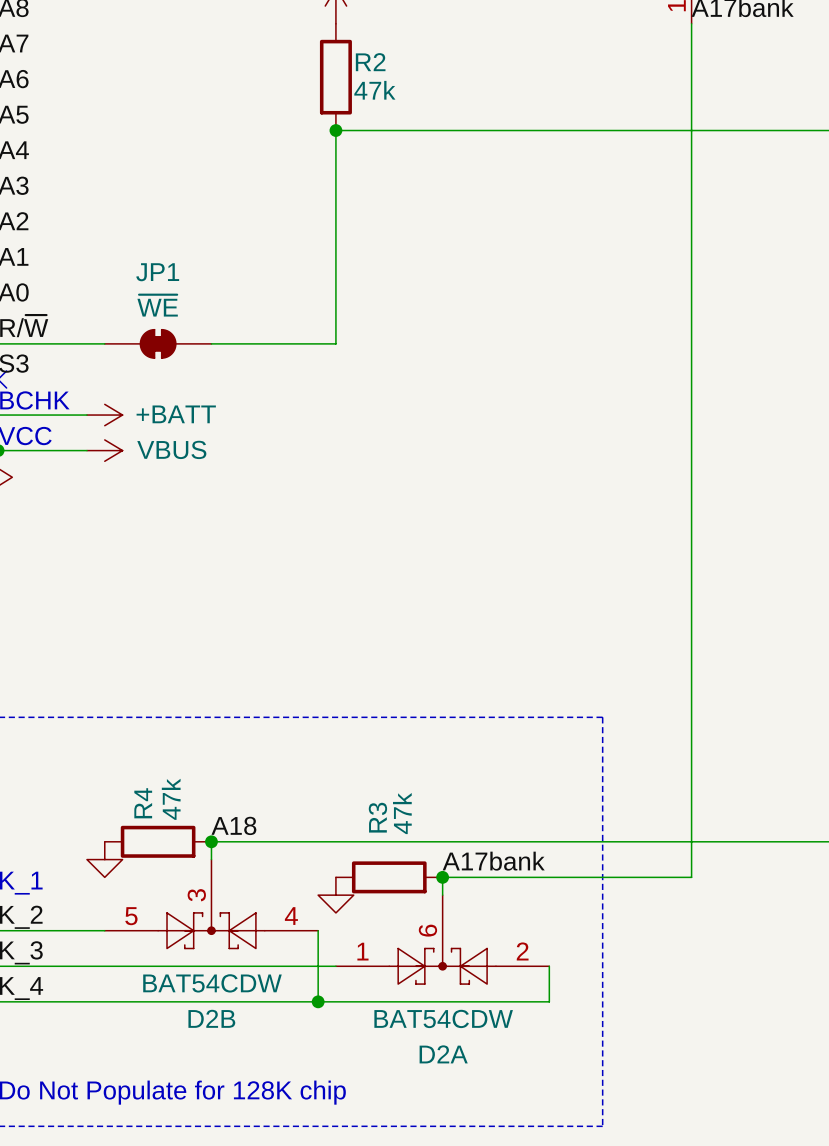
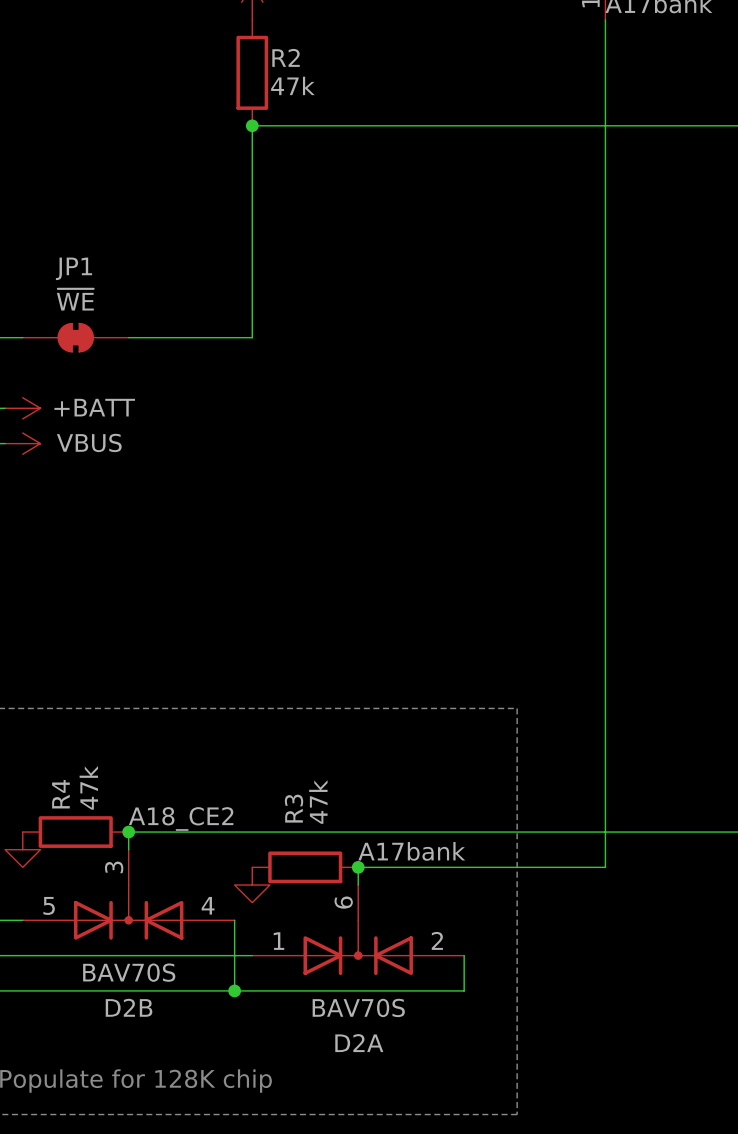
label: A18 (233, 825) -> A18_CE2 (181, 818)
D2B symbol: [104, 859, 319, 949] -> [22, 849, 235, 940]
D2A symbol: [335, 895, 550, 985] -> [252, 885, 465, 976]
D2B value: BAT54CDW (212, 983) -> BAV70S (129, 972)
D2A value: BAT54CDW (443, 1018) -> BAV70S (358, 1007)

